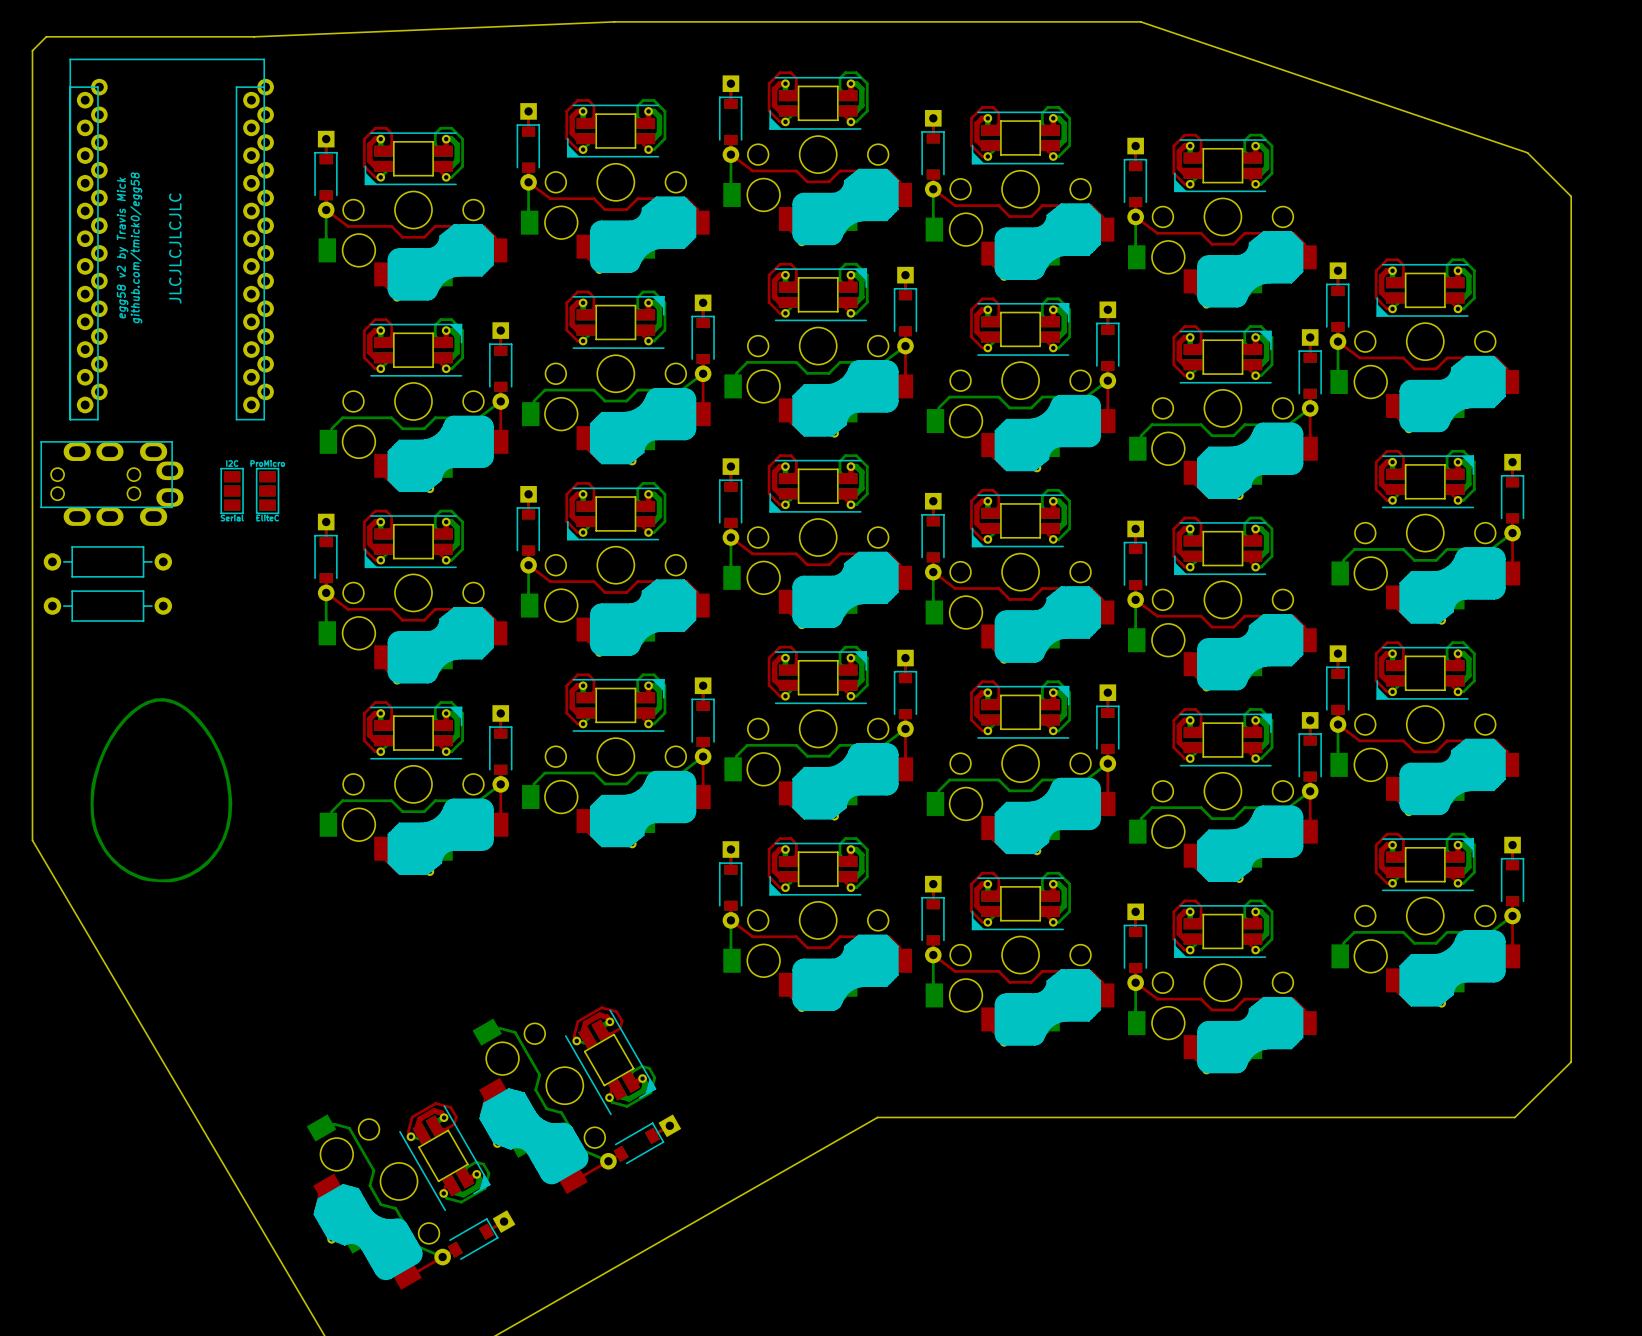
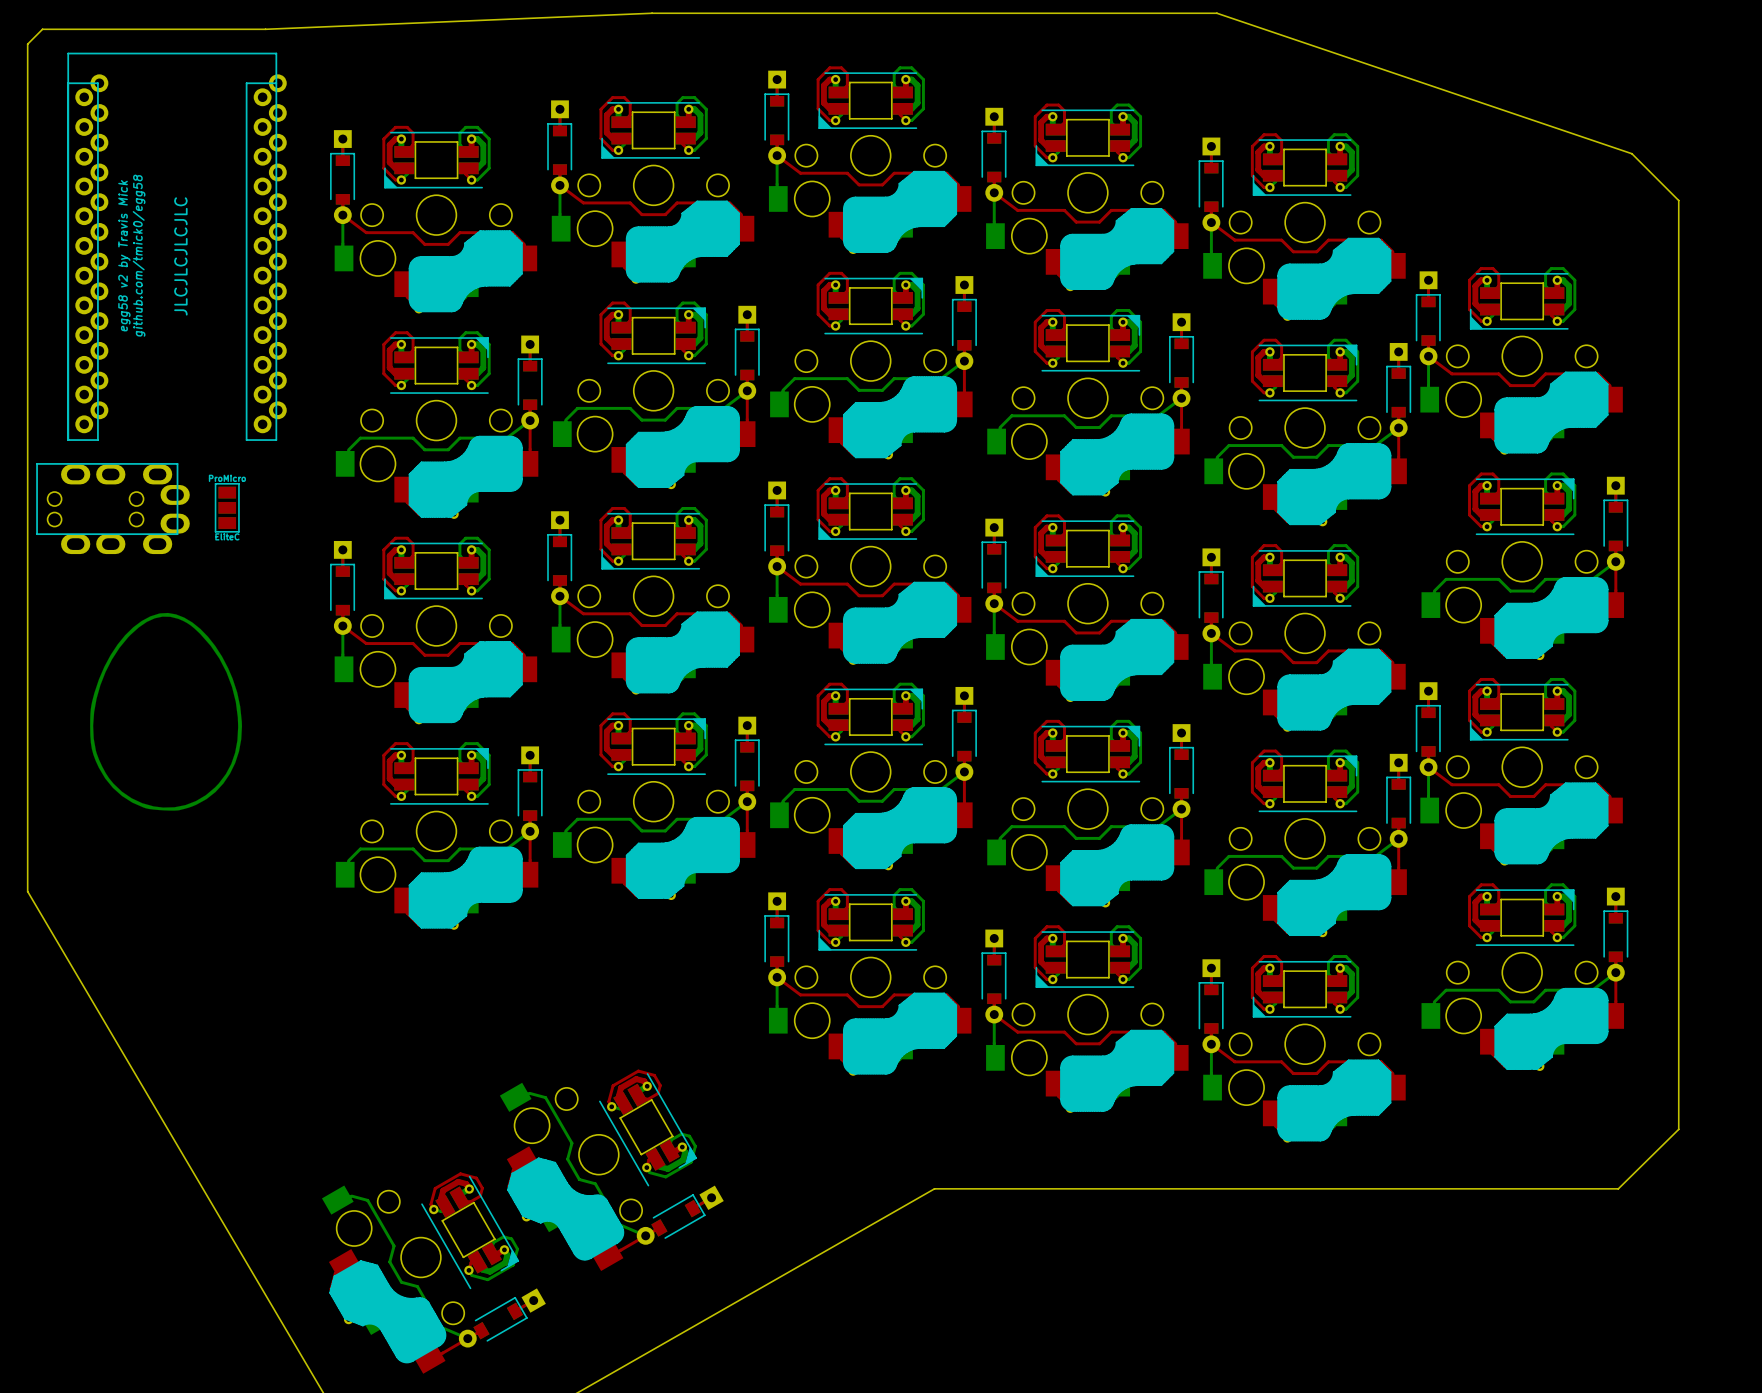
part: (232, 490) -> none
part position: (267, 490) -> (227, 507)
part: (107, 561) -> none
part: (107, 606) -> none
drawing position: (161, 790) -> (166, 711)

